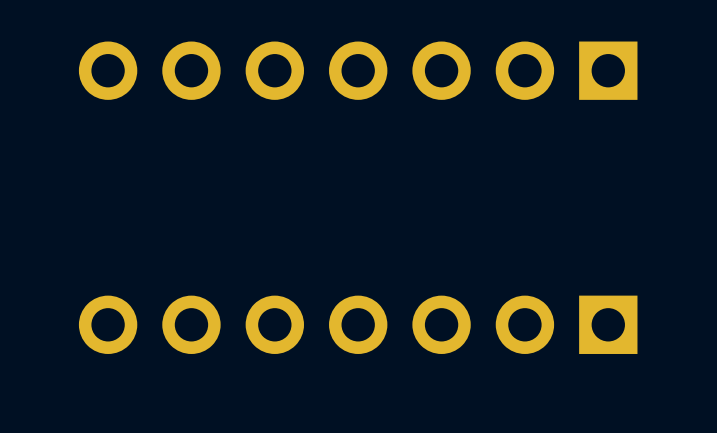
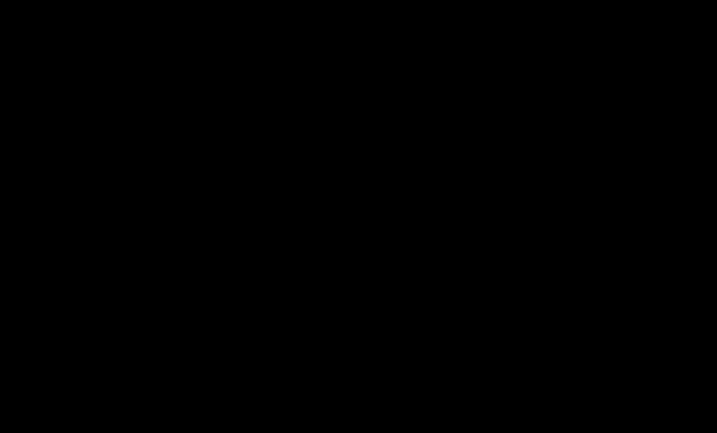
part: (358, 70) -> none
part: (358, 324) -> none

